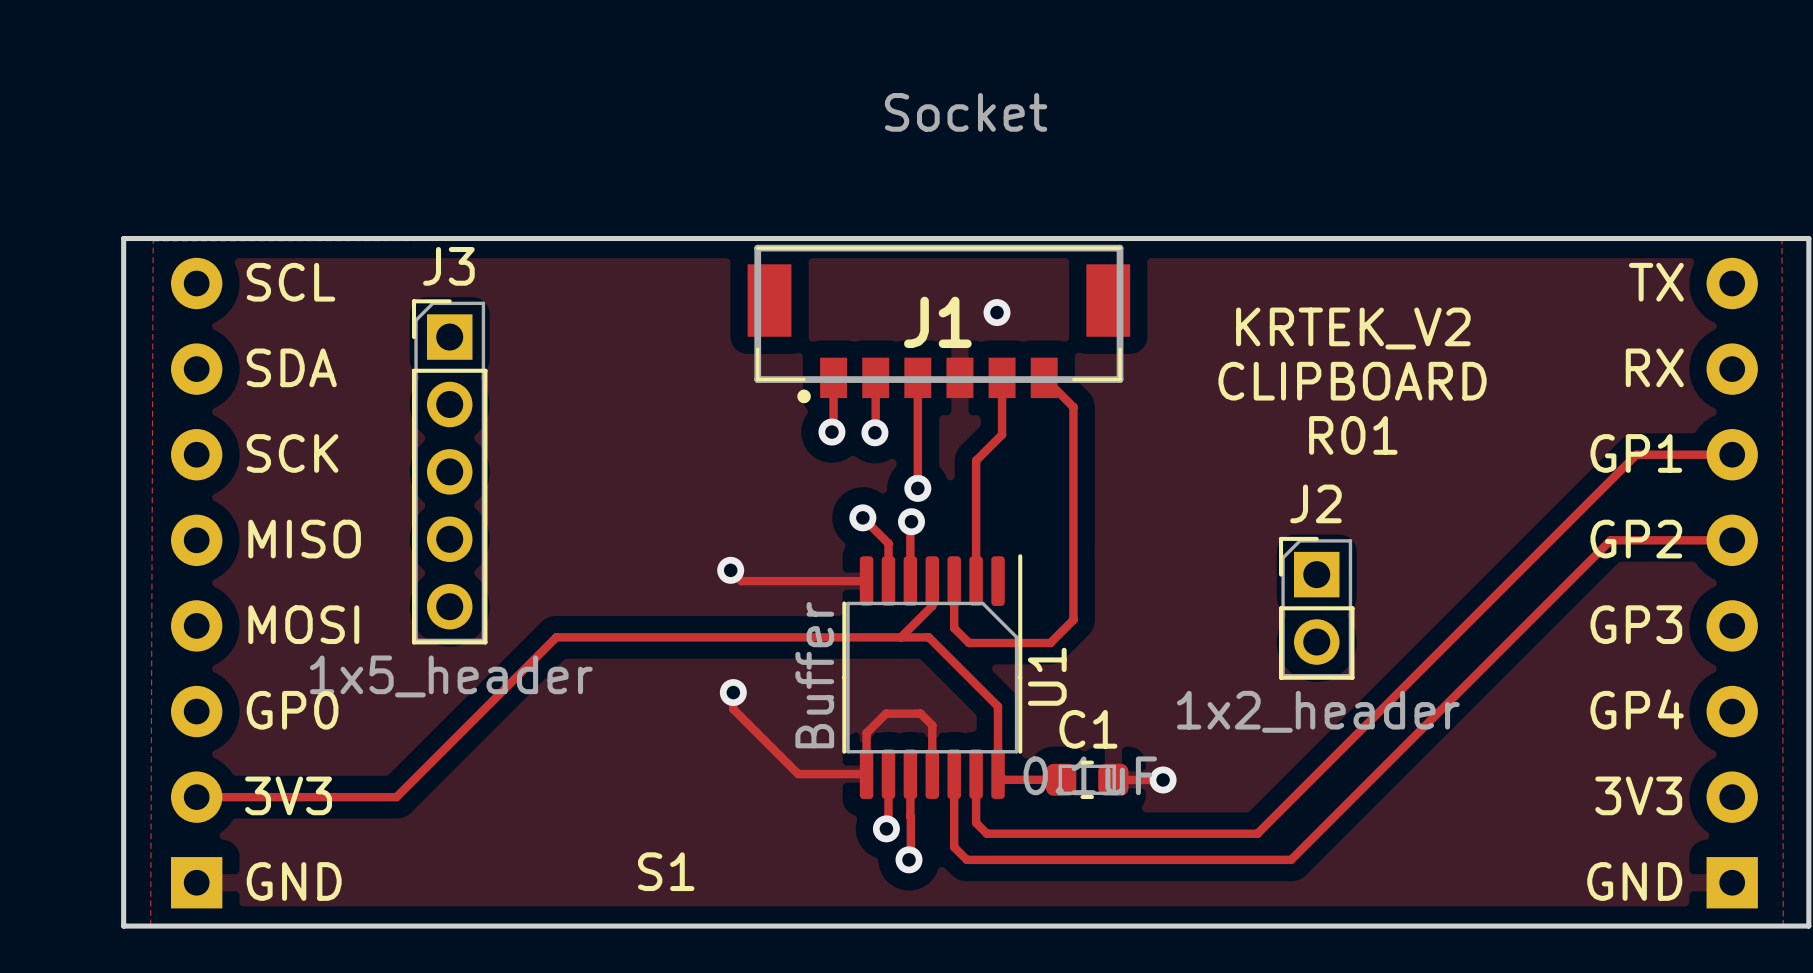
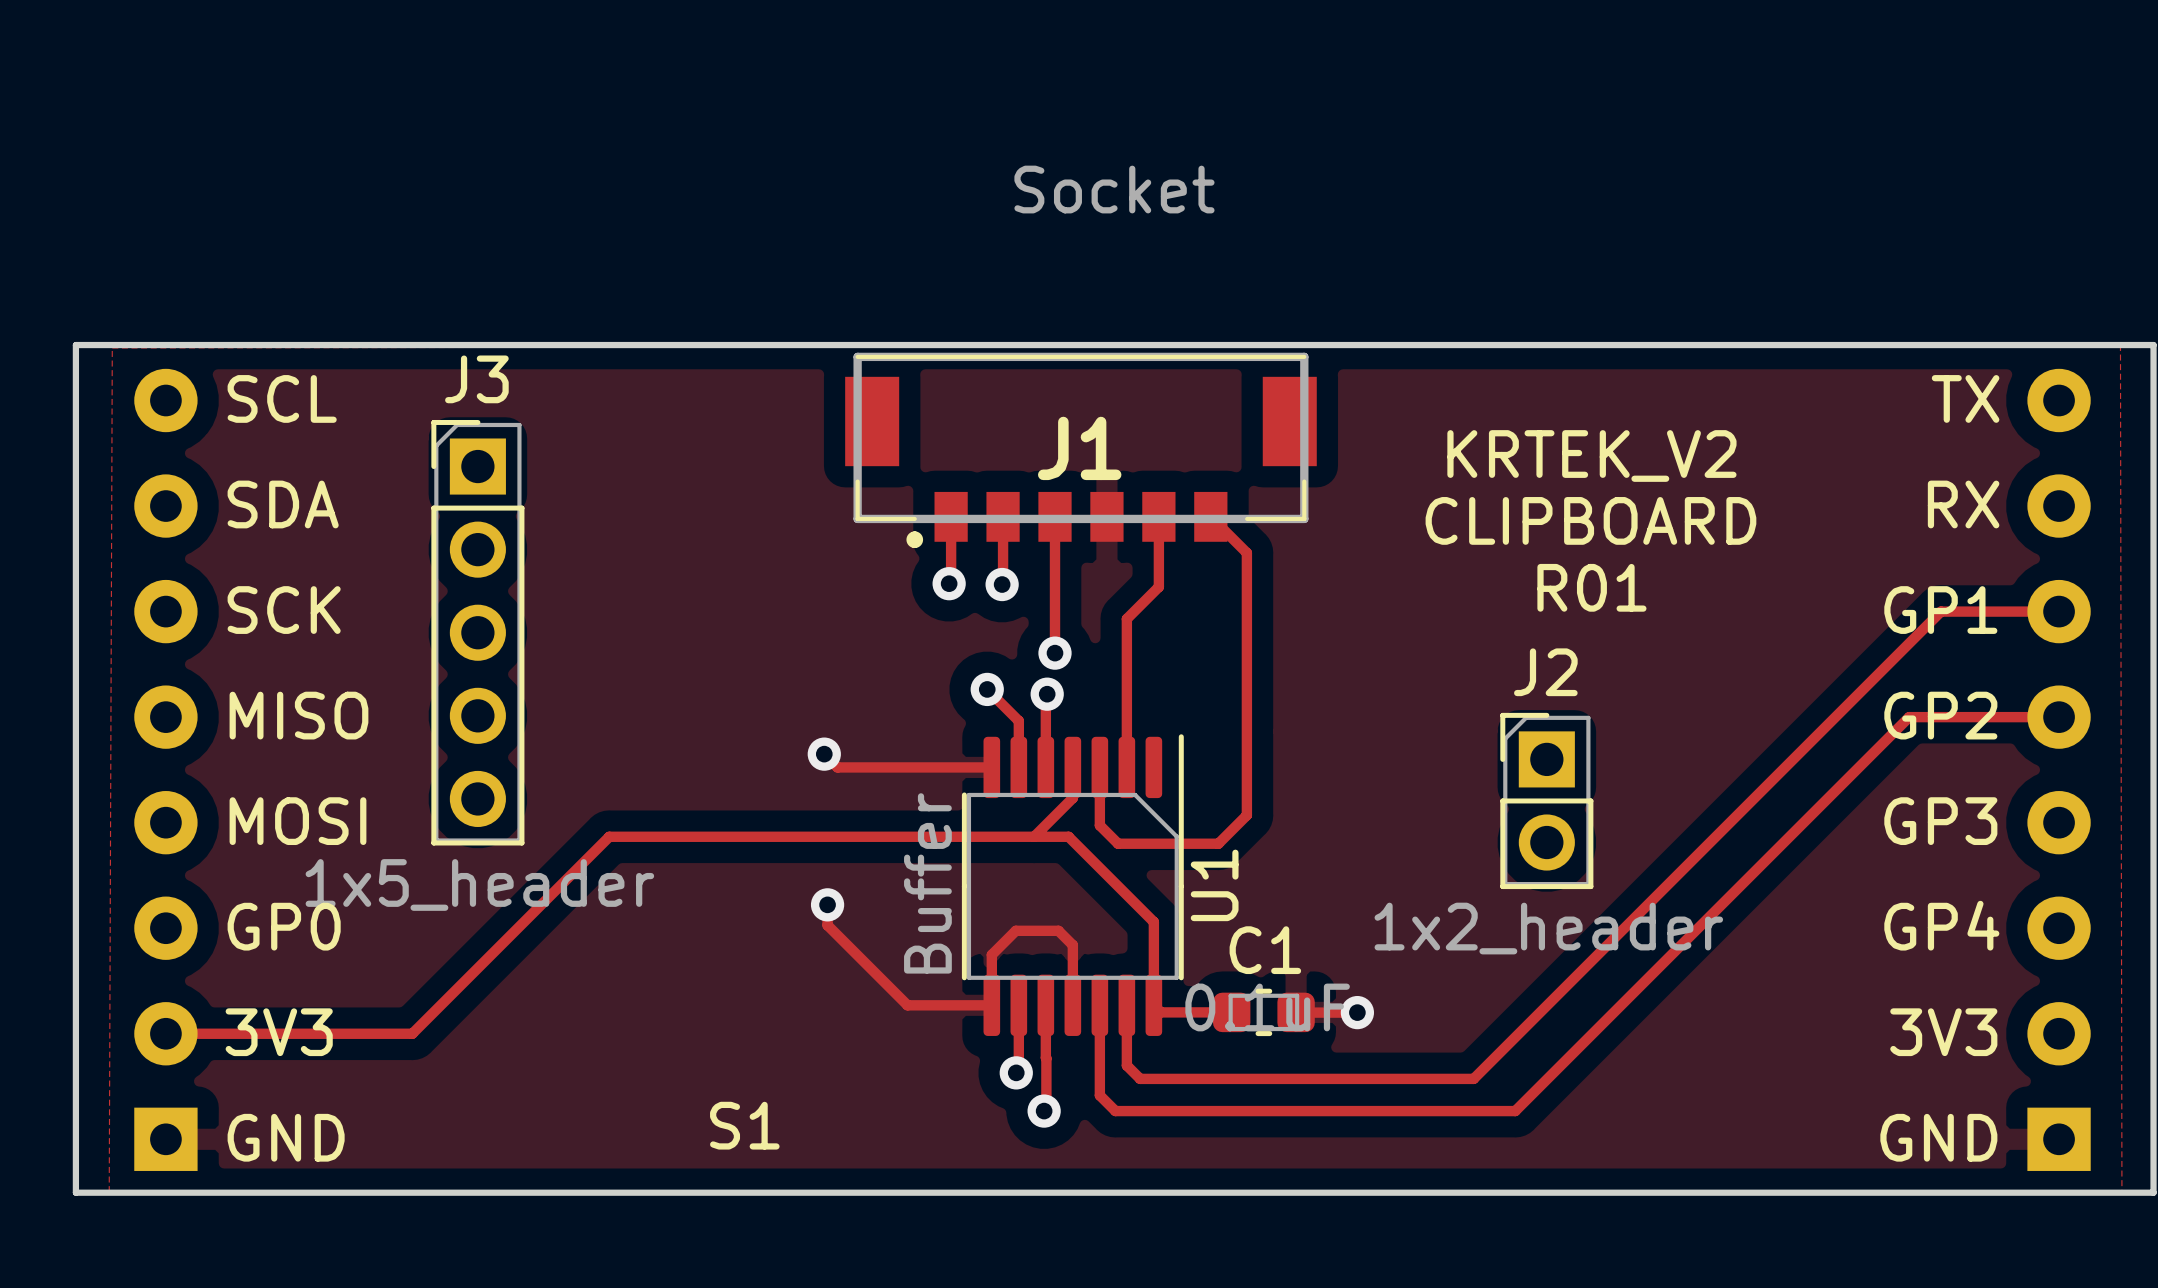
via: (997, 312) -> none

